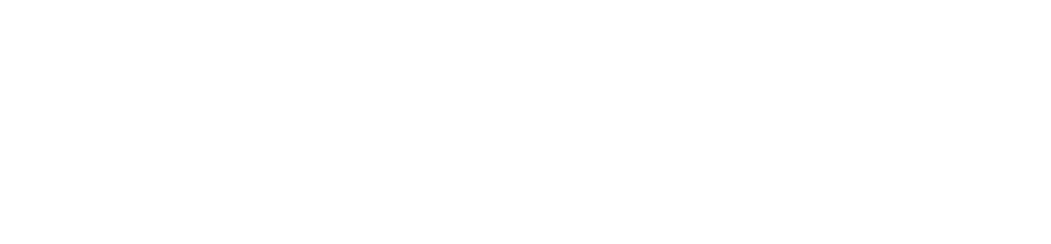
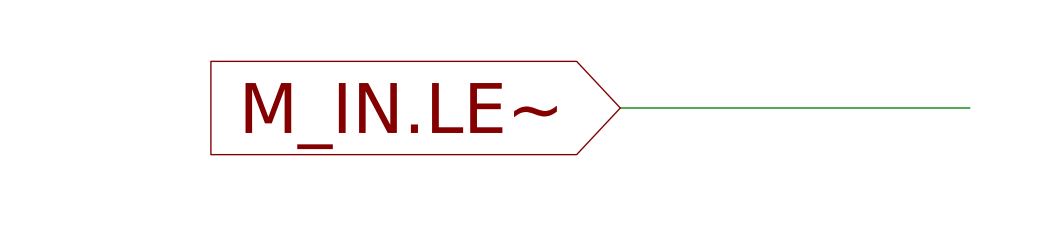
wire: none -> (620, 108) (969, 108)
global label: none -> M_IN.LE~ (401, 116)

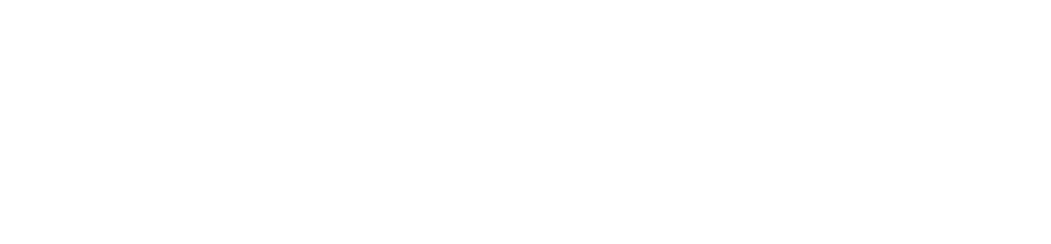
wire: (620, 108) (969, 108) -> none
global label: M_IN.LE~ (401, 116) -> none

